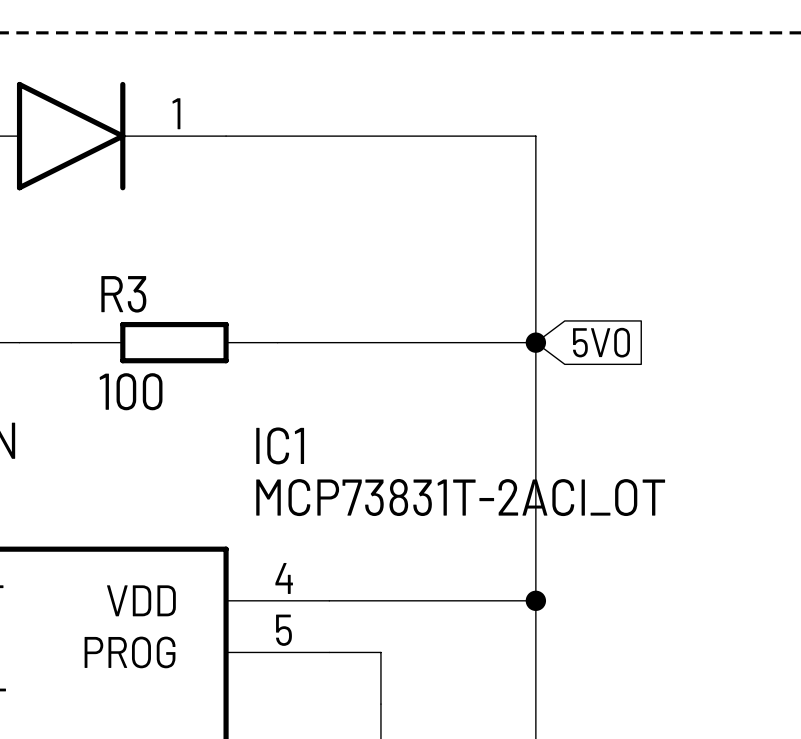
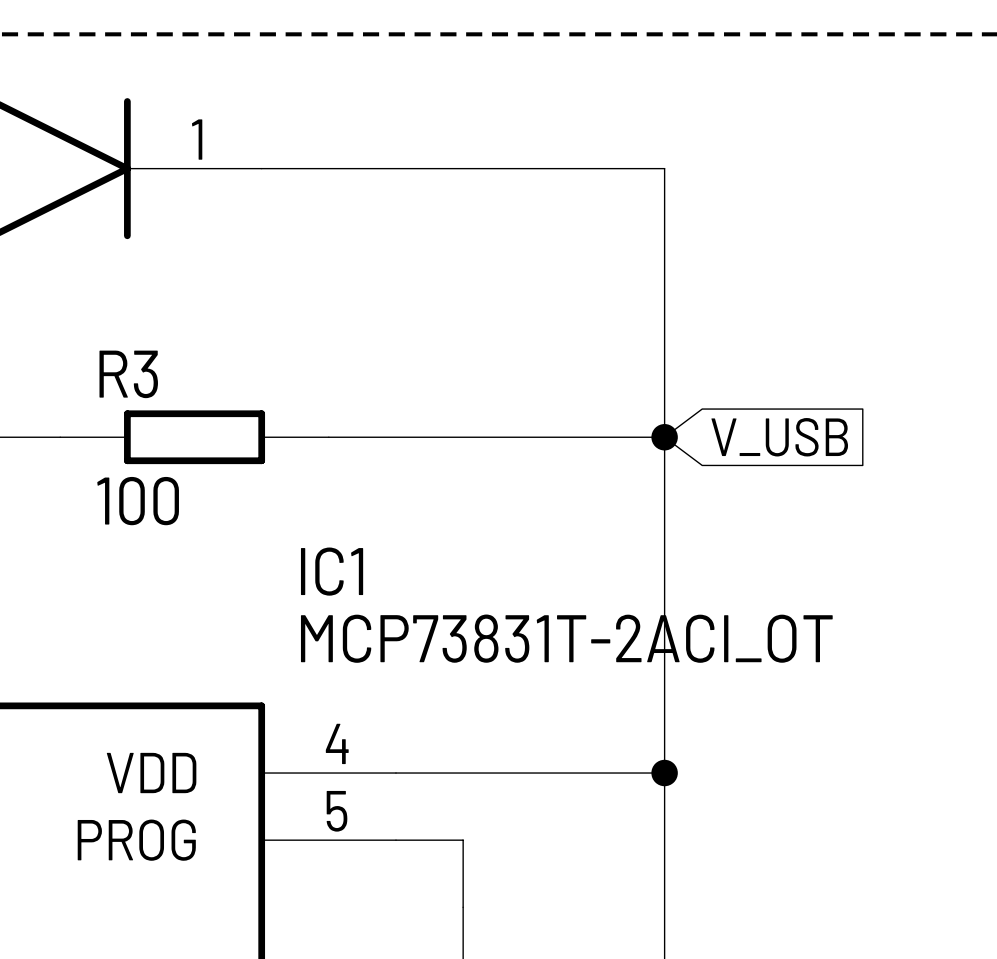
global label: 5V0 (601, 342) -> V_USB (779, 437)

